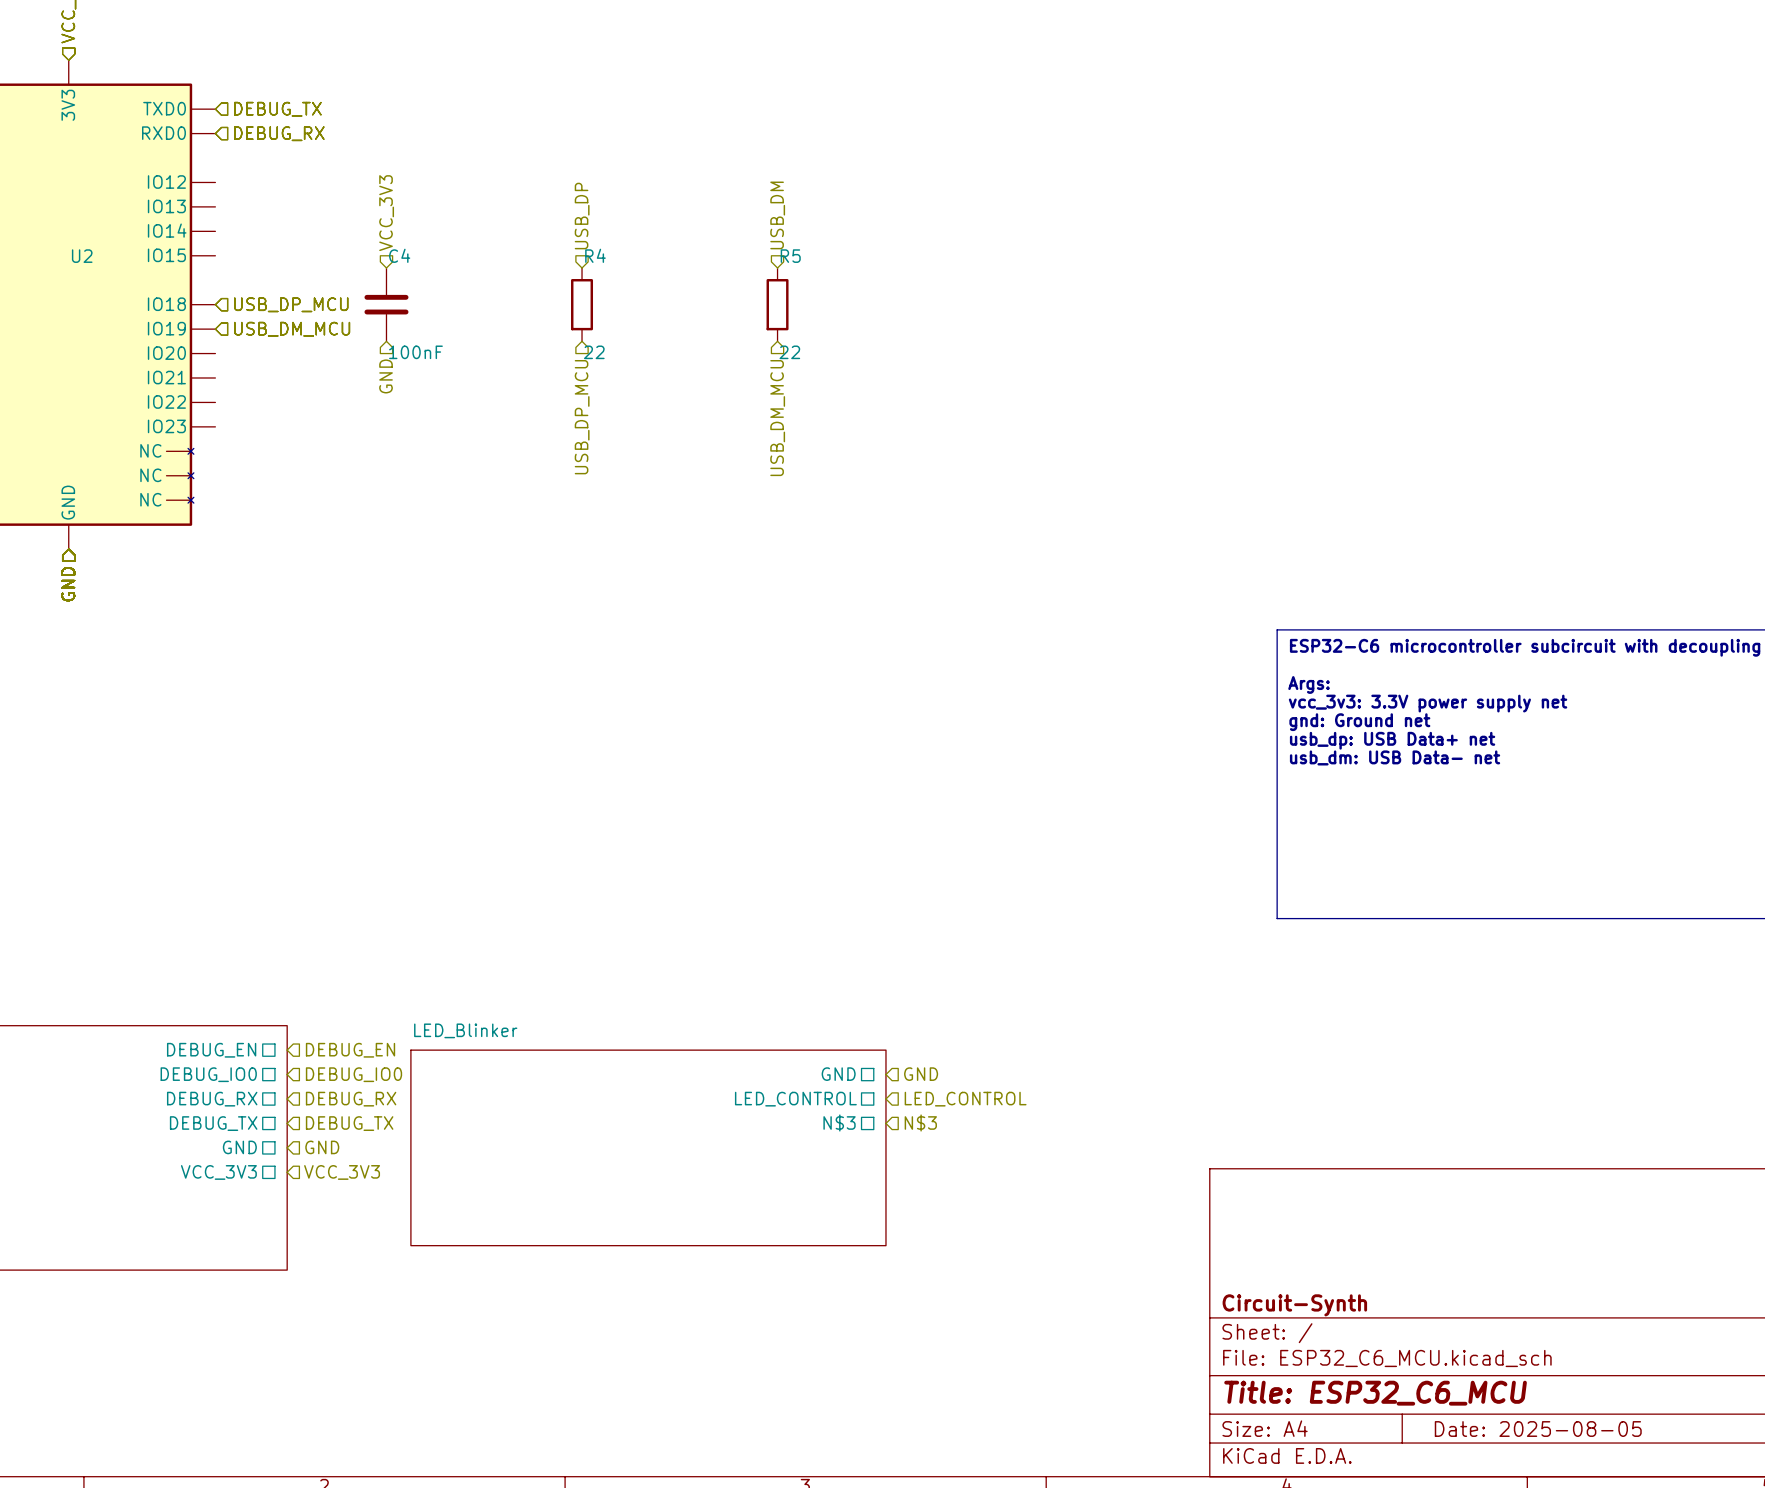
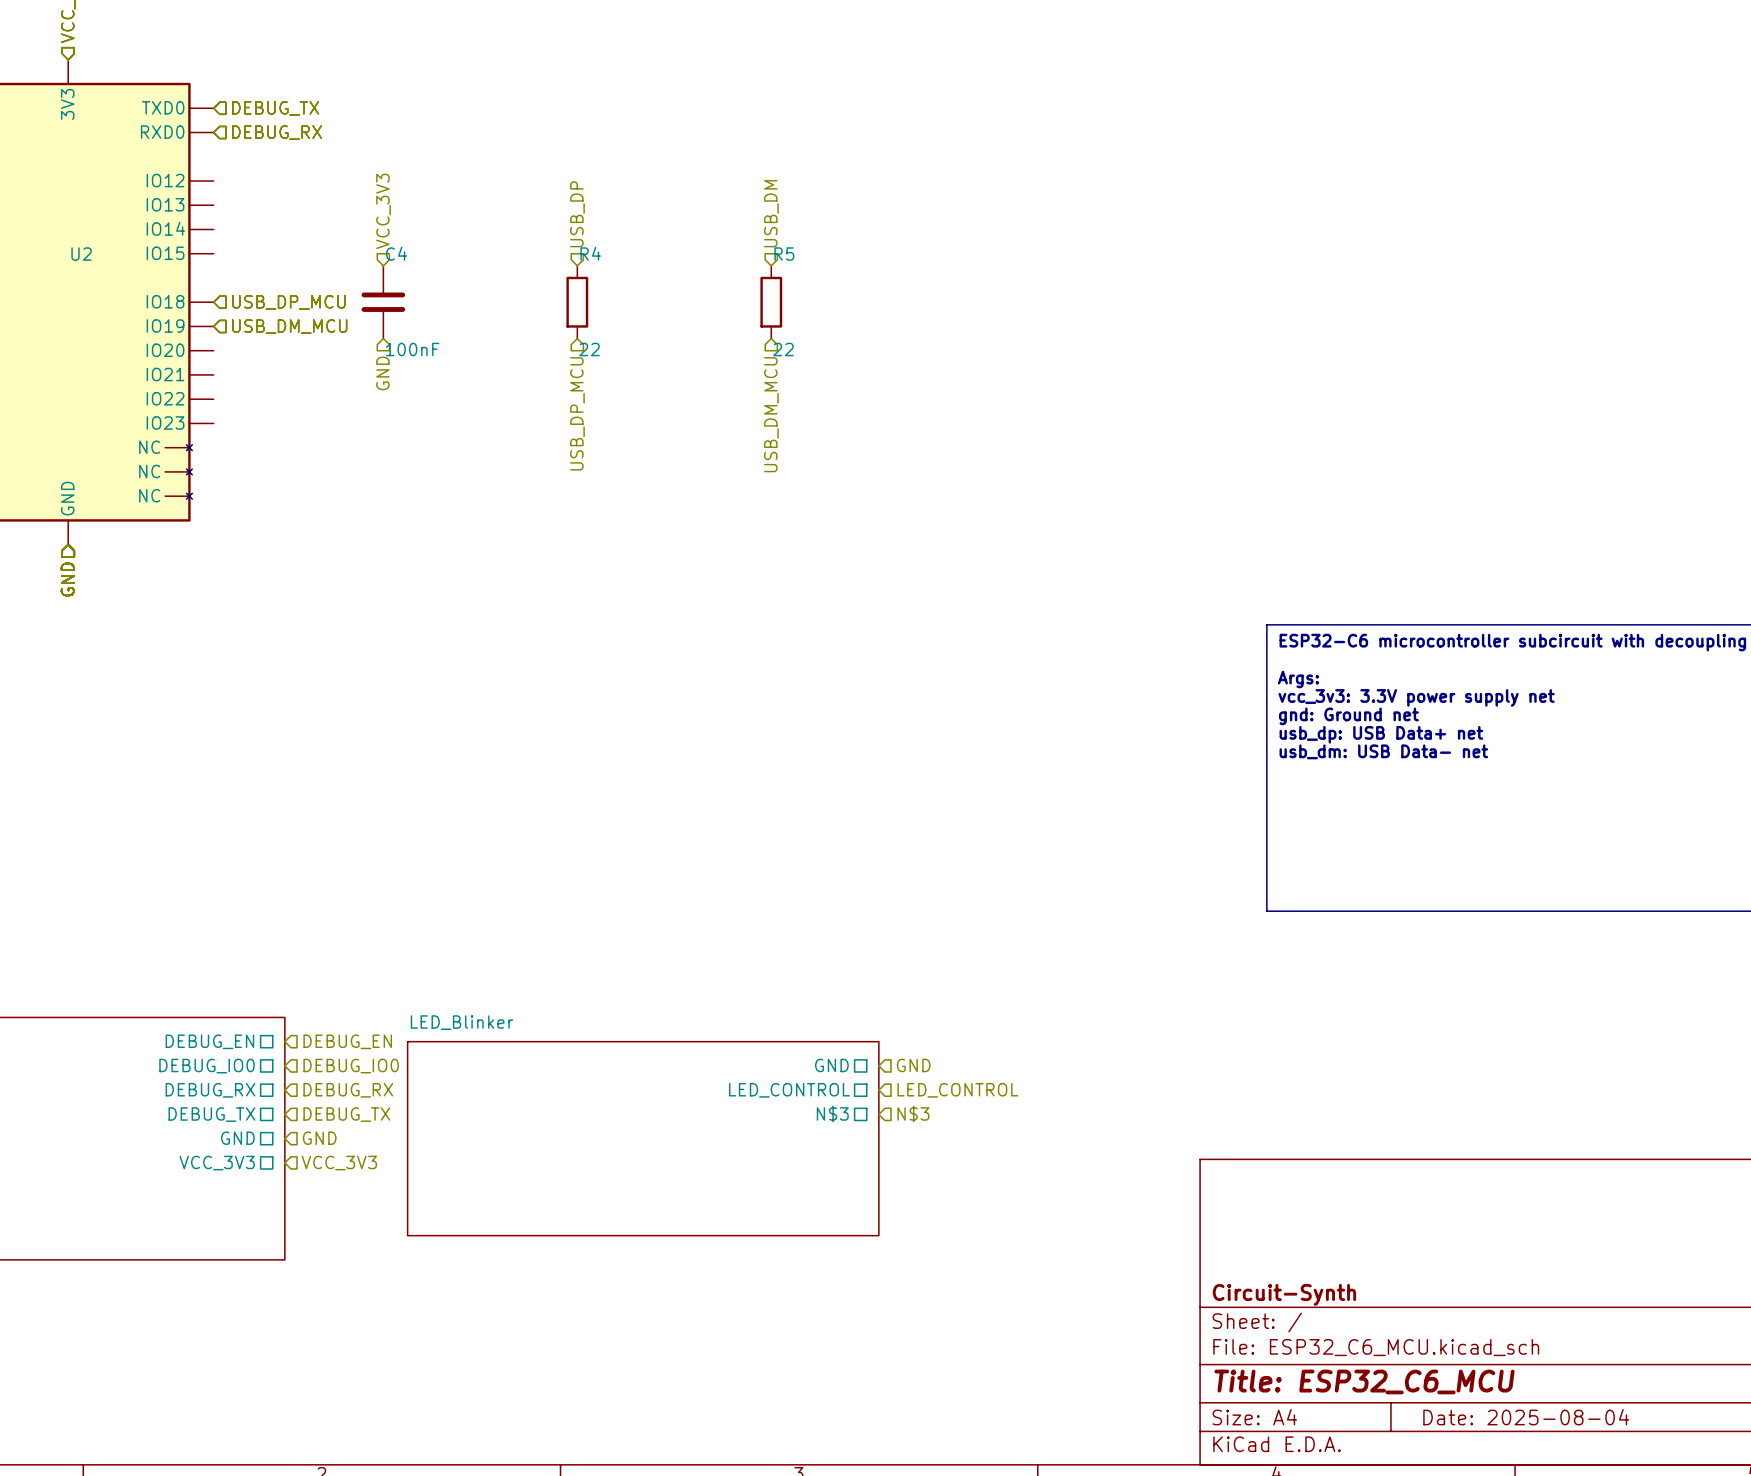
title block: Date: 2025-08-05 (1538, 1429) -> Date: 2025-08-04 (1526, 1417)

